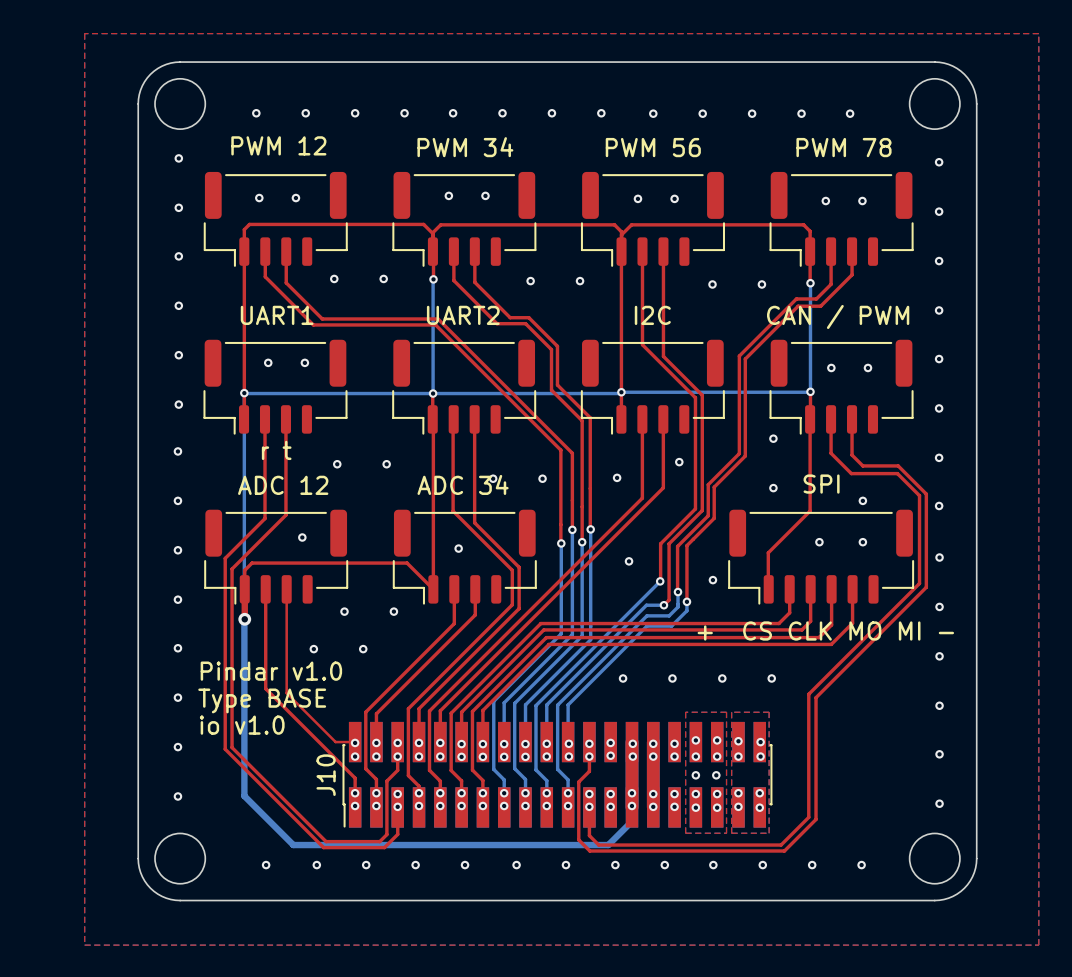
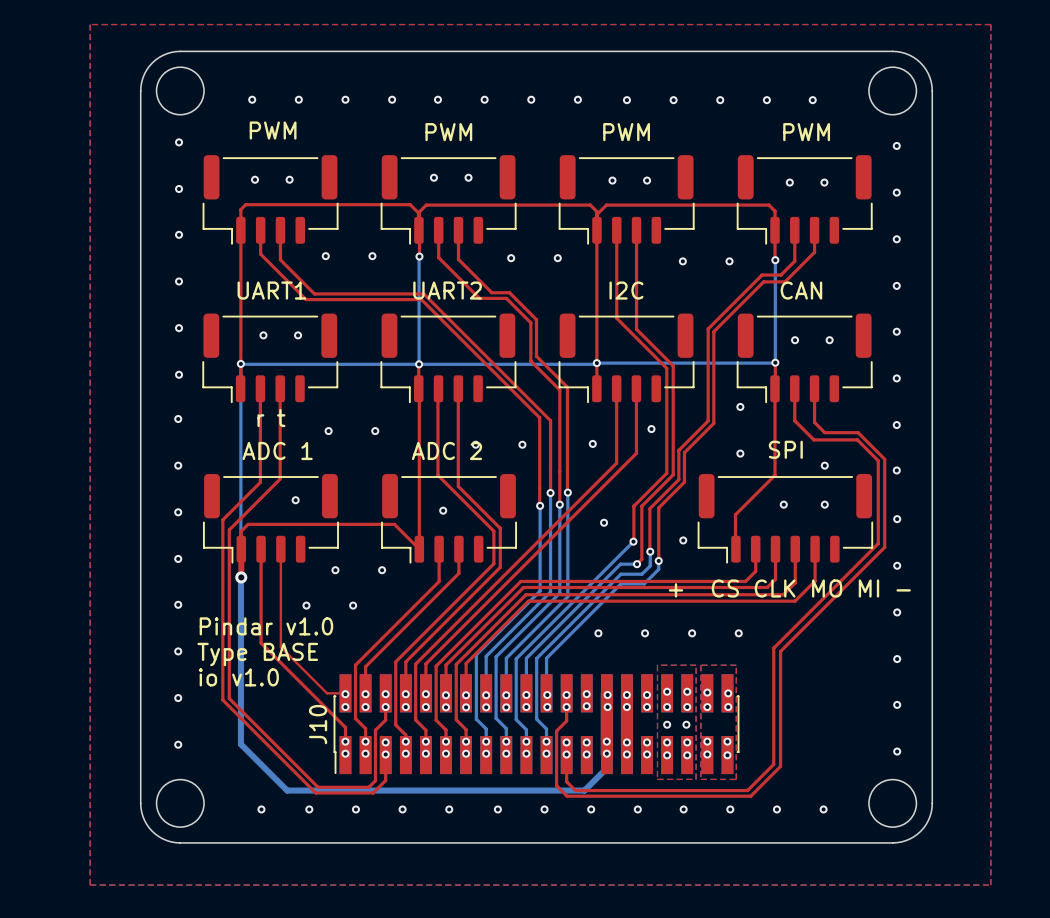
part value: PWM 12 (278, 145) -> PWM (273, 130)
part value: PWM 34 (465, 147) -> PWM (448, 132)
part value: PWM 56 (653, 147) -> PWM (626, 132)
part value: PWM 78 (844, 147) -> PWM (806, 132)
part value: CAN / PWM (838, 316) -> CAN (801, 290)
part value: ADC 34 (463, 484) -> ADC 2 (446, 450)
part value: ADC 12 (283, 485) -> ADC 1 (277, 450)

